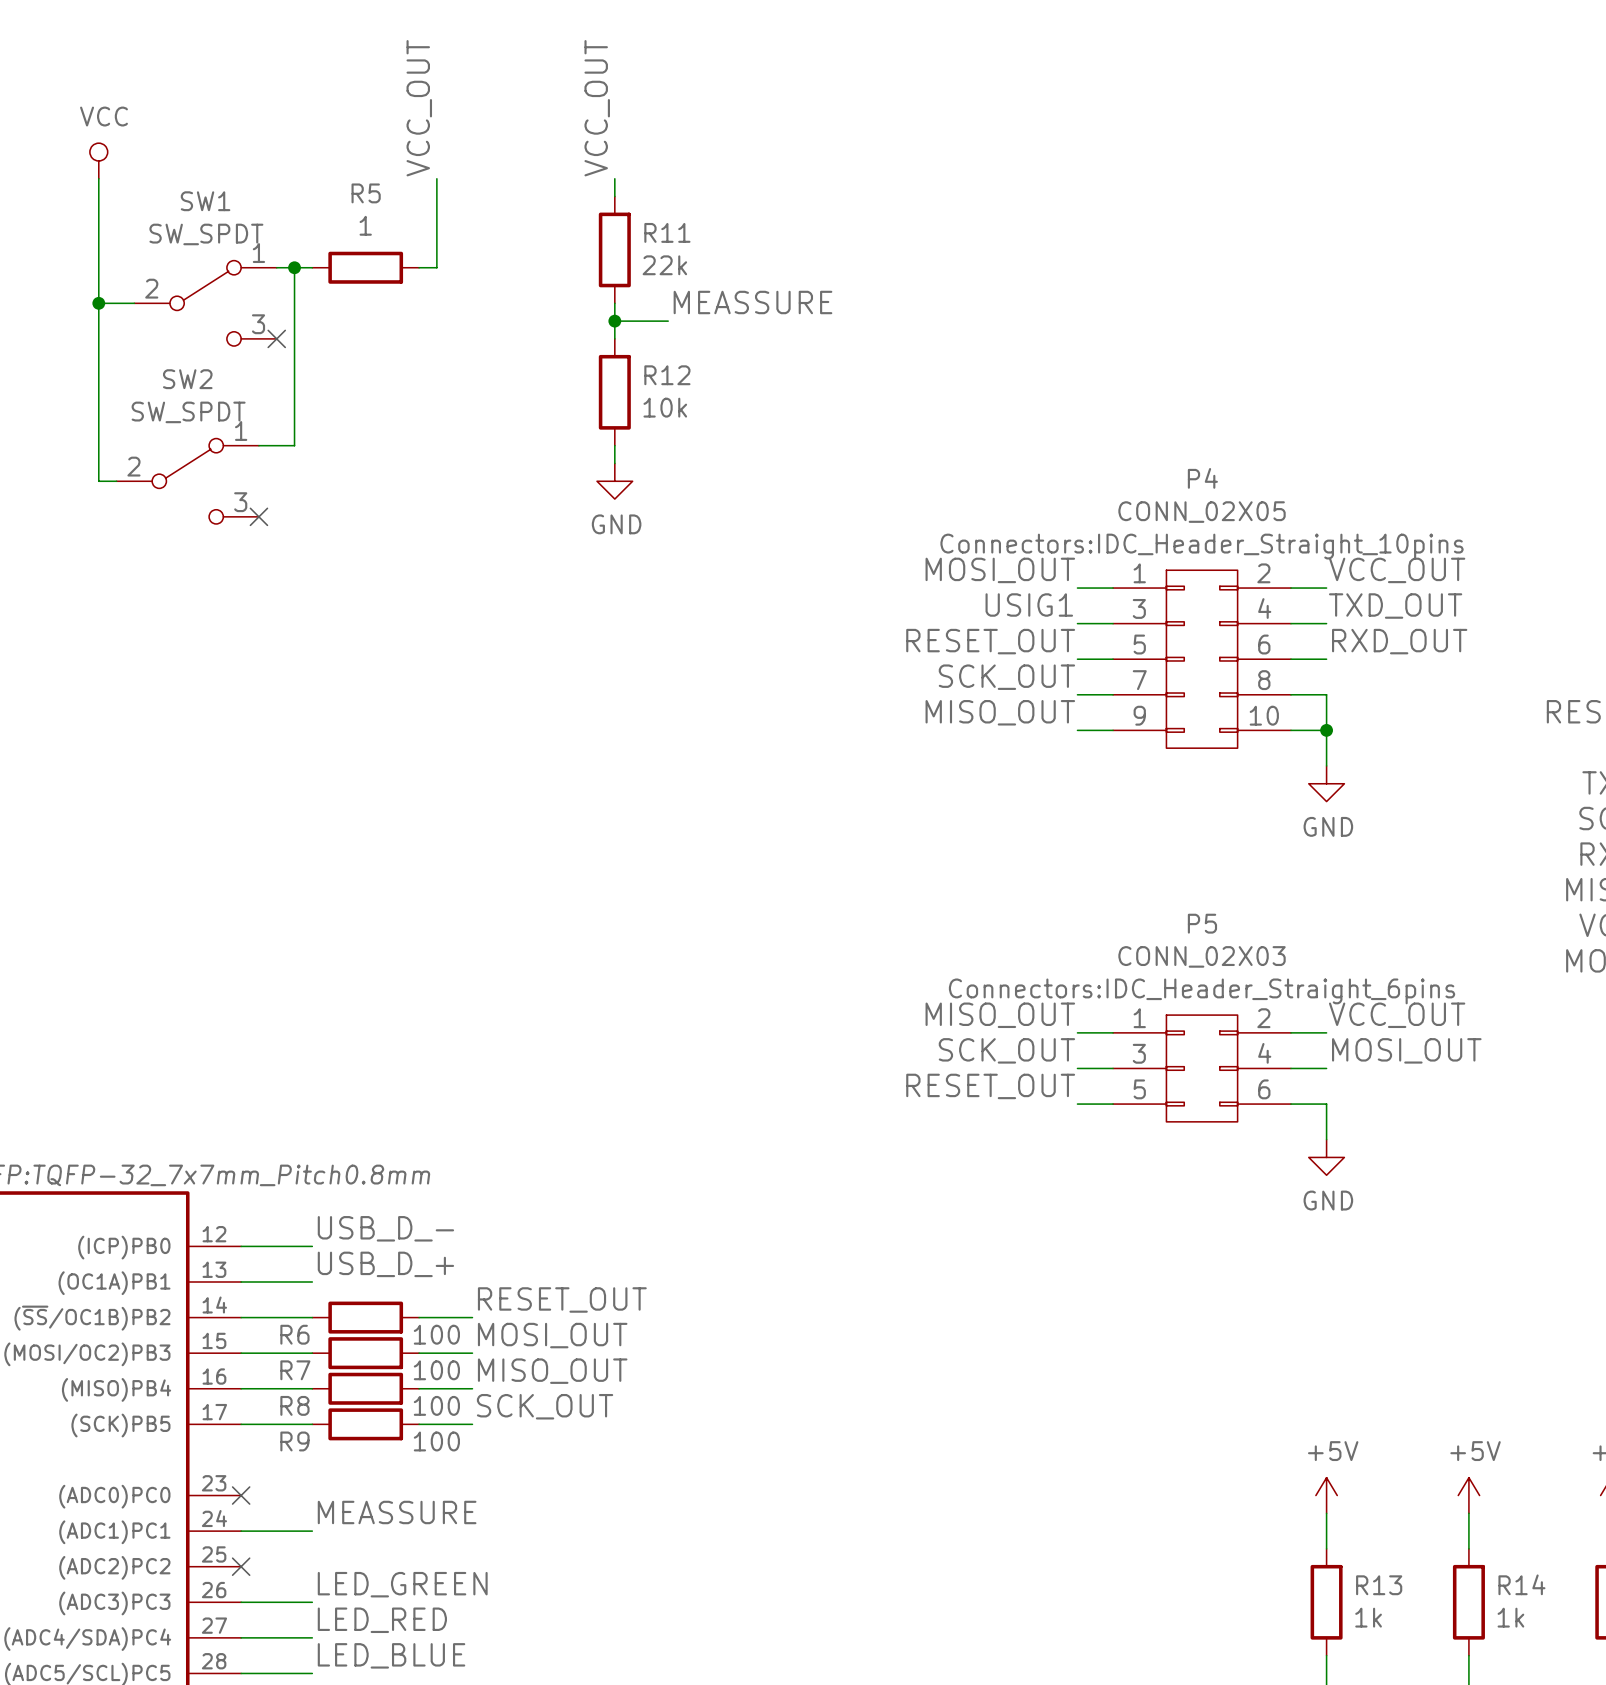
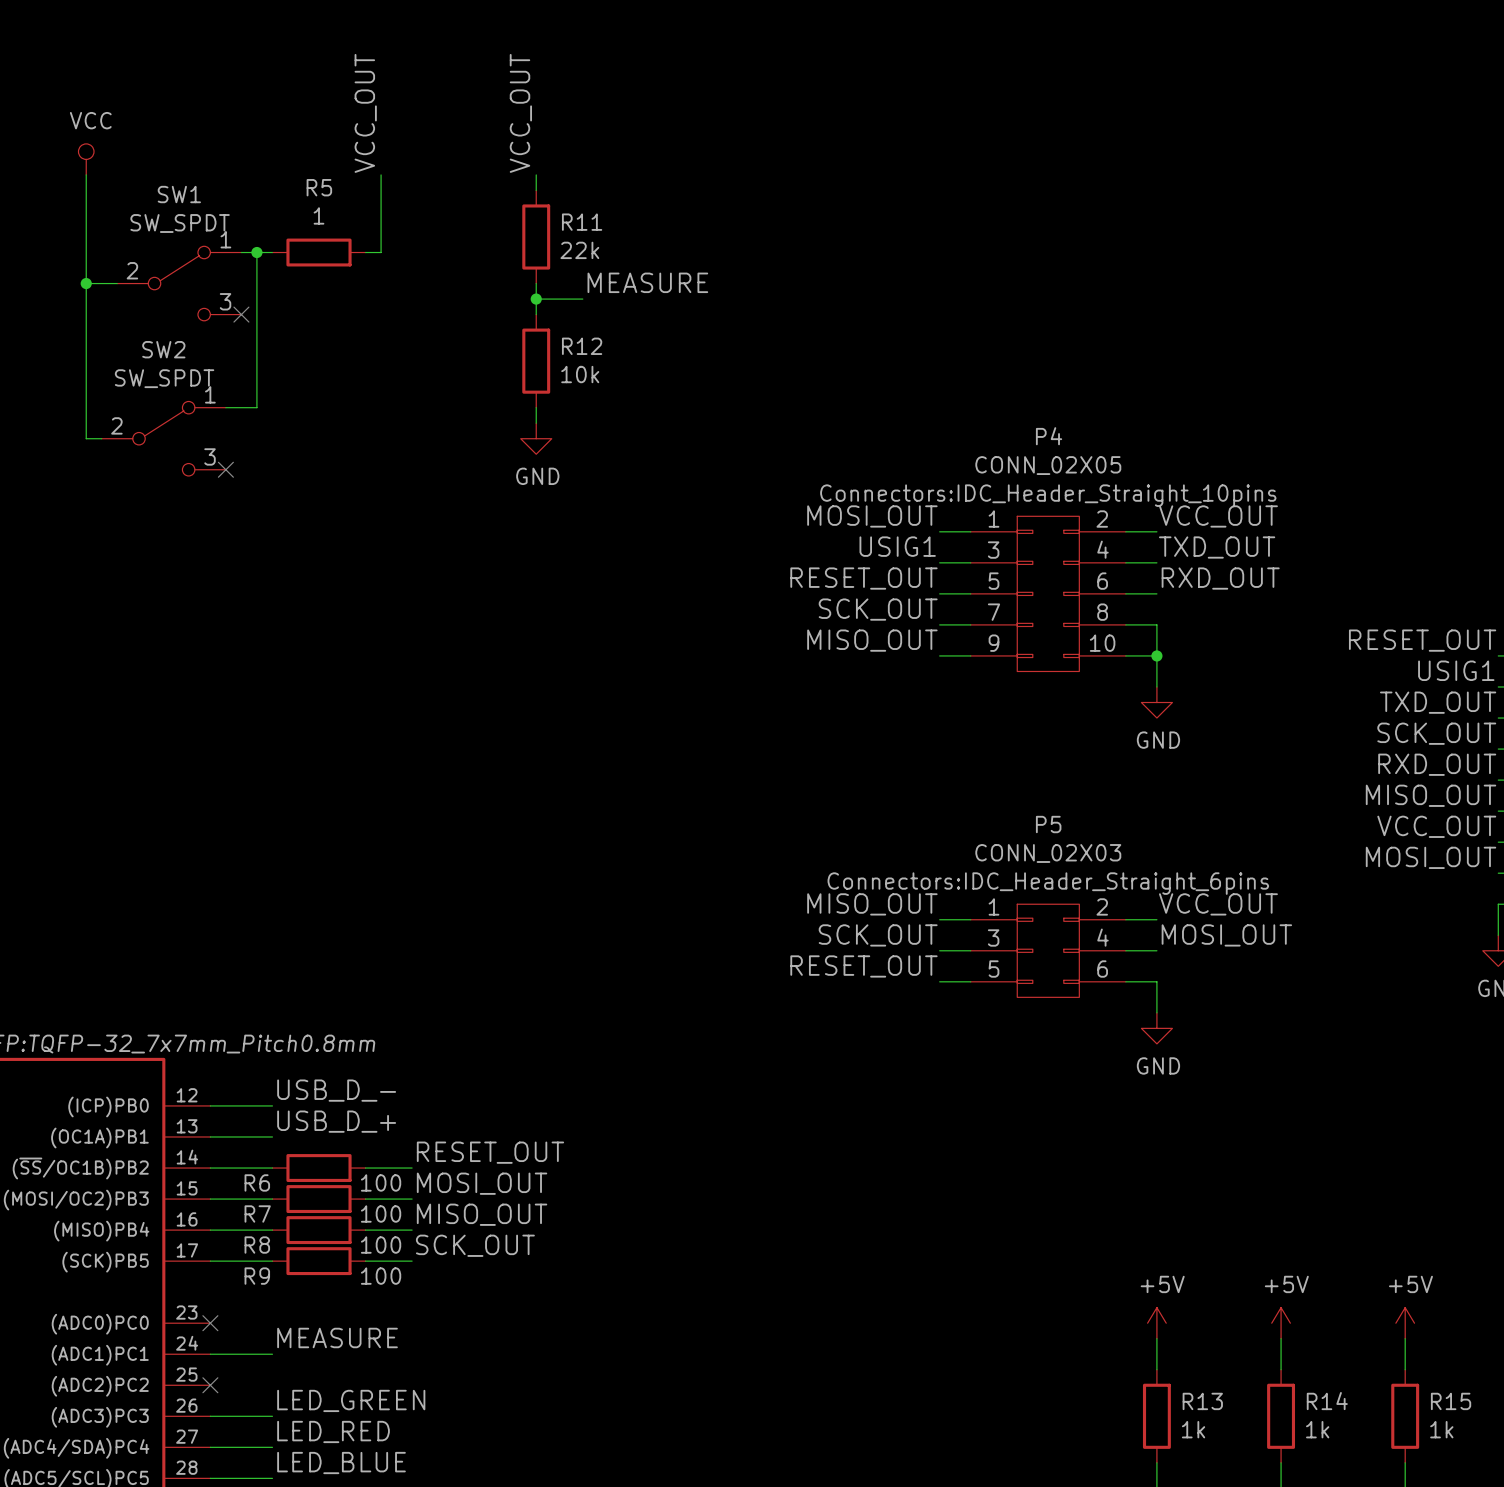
label: MEASSURE (752, 302) -> MEASURE (647, 282)
label: MEASSURE (397, 1512) -> MEASURE (337, 1337)

